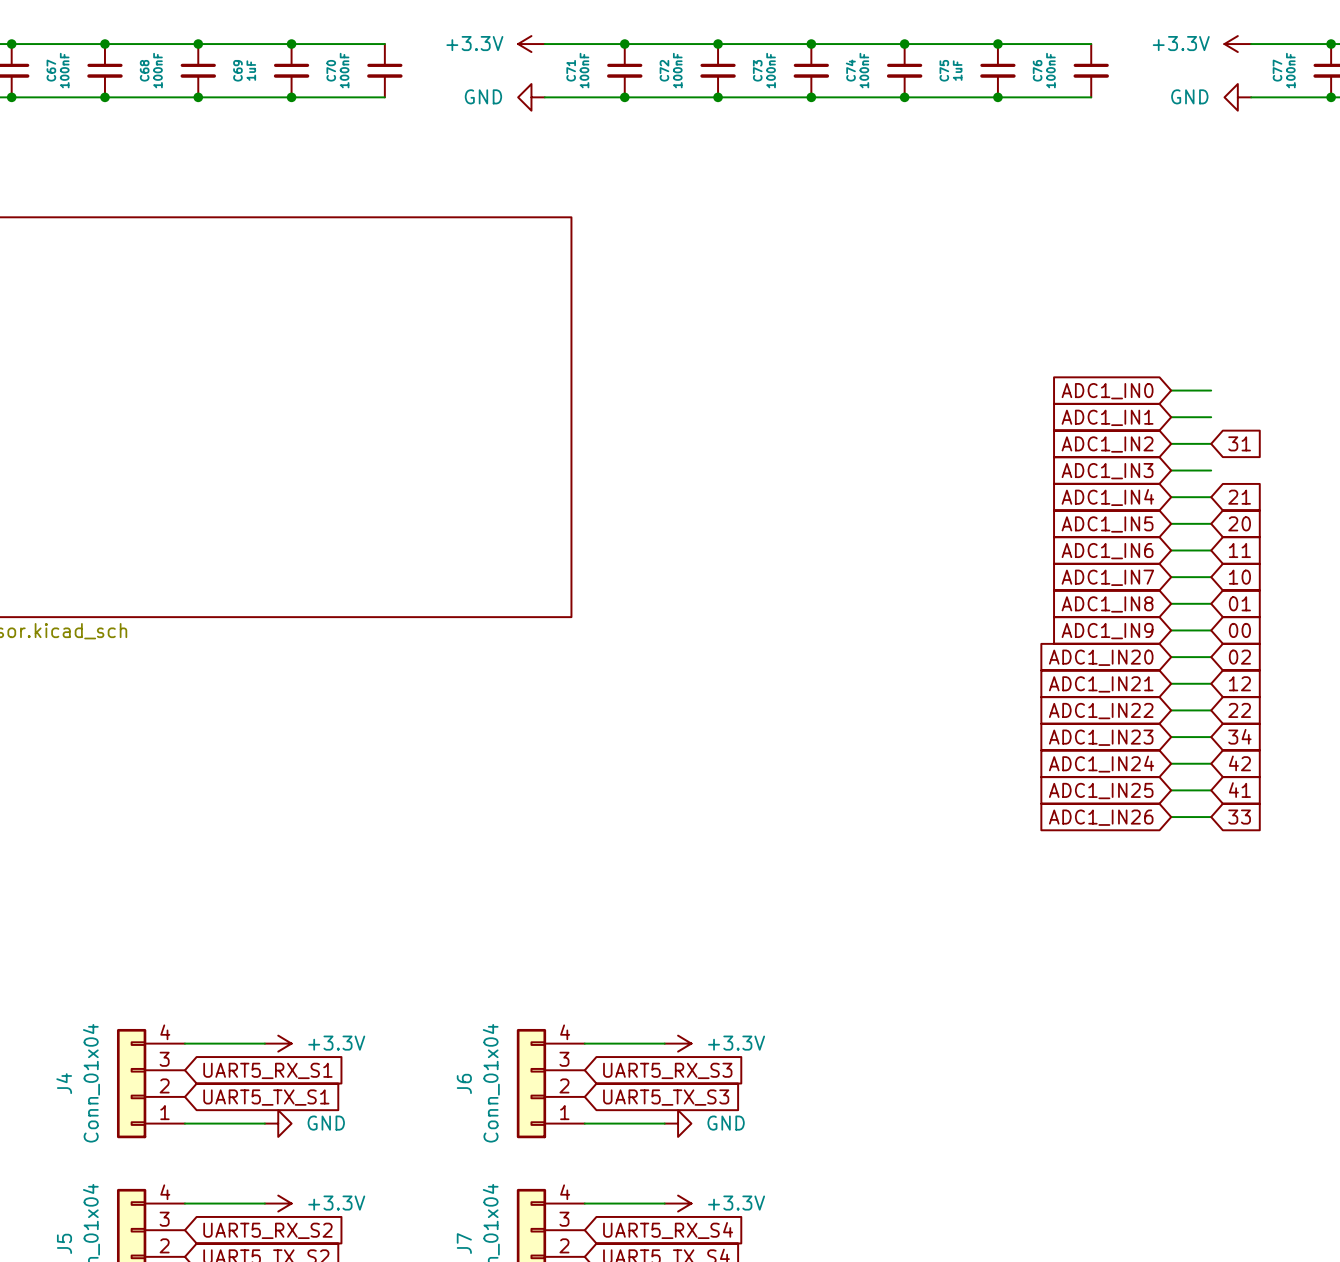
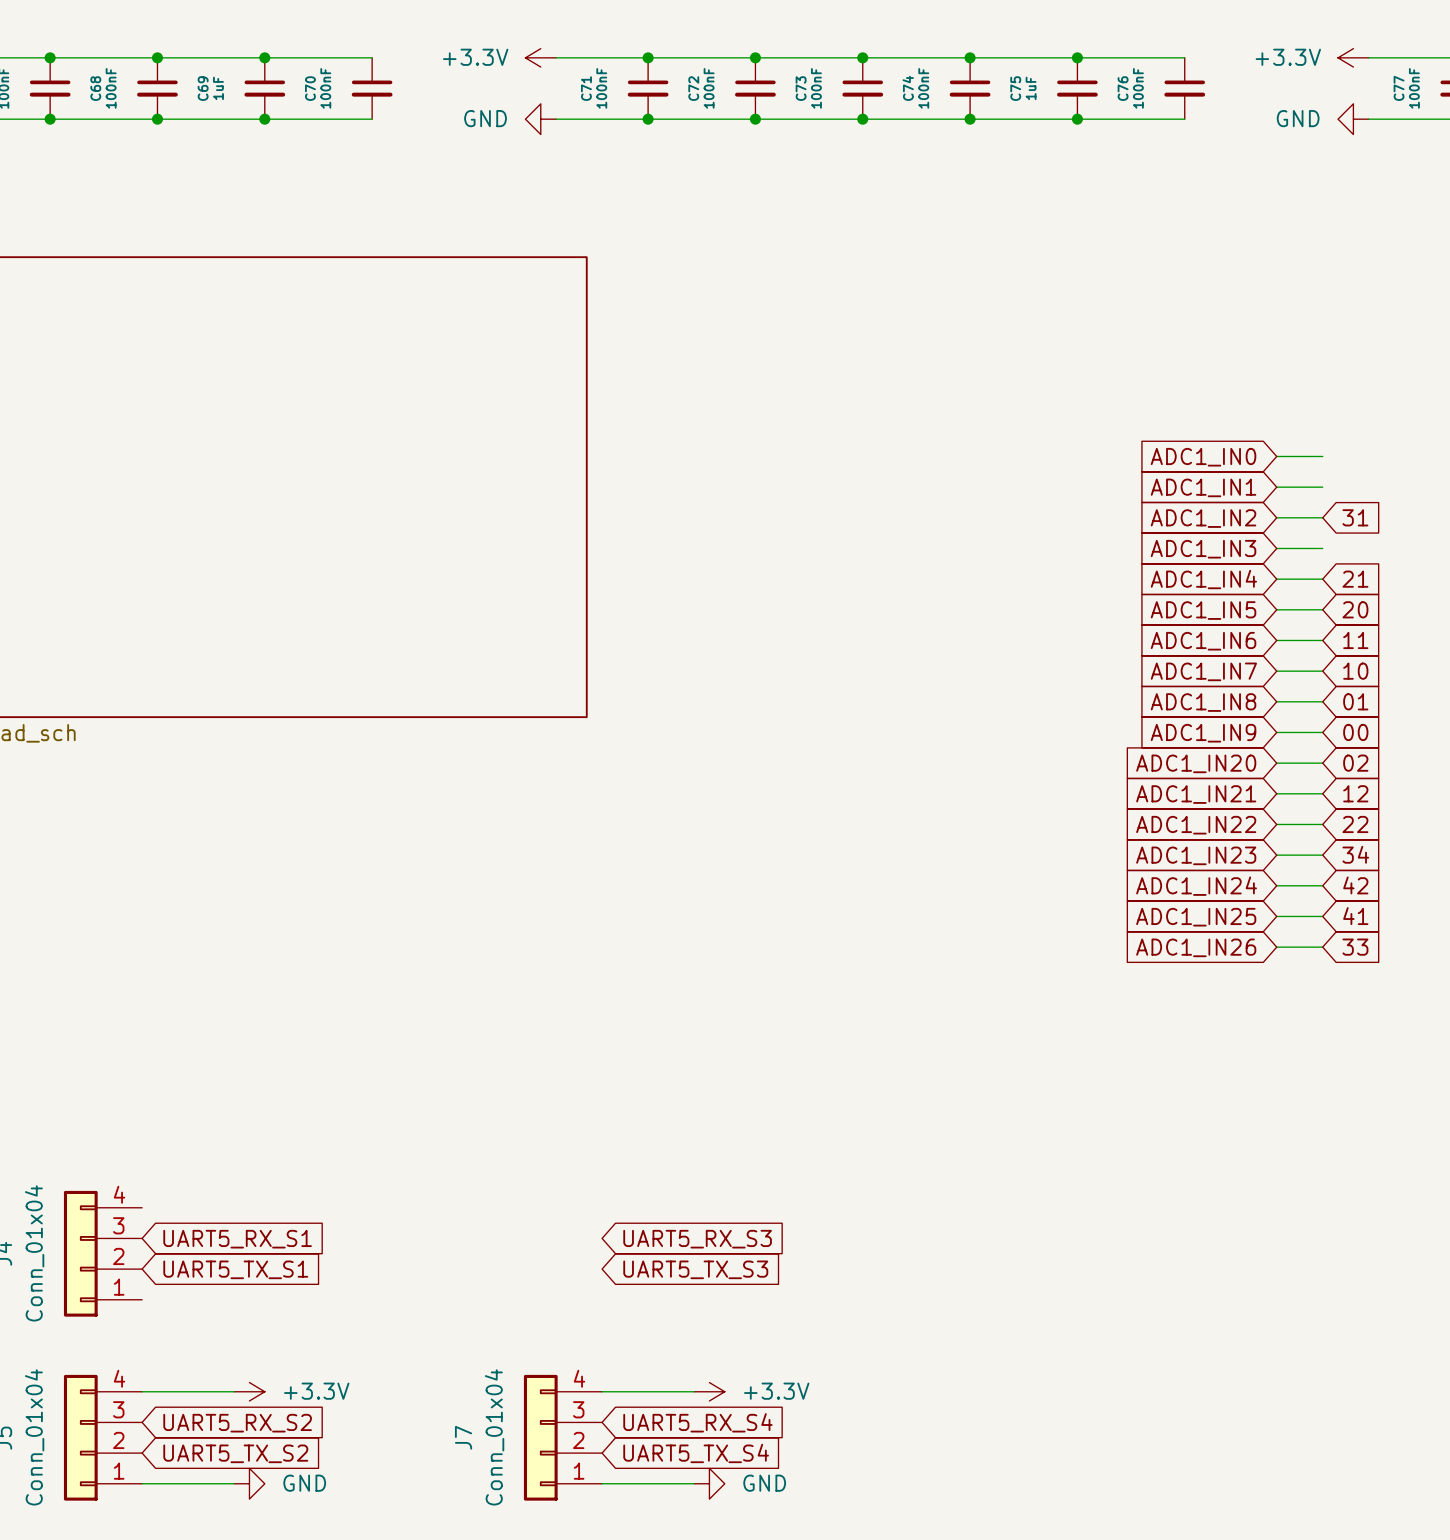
wire: (184, 1043) (264, 1043) -> none
power symbol: +3.3V (278, 1043) -> none
wire: (584, 1043) (664, 1043) -> none
power symbol: +3.3V (678, 1043) -> none
J6: Conn_01x04 (550, 1083) -> none
wire: (184, 1123) (264, 1123) -> none
power symbol: GND (278, 1123) -> none
wire: (584, 1123) (664, 1123) -> none
power symbol: GND (678, 1123) -> none

